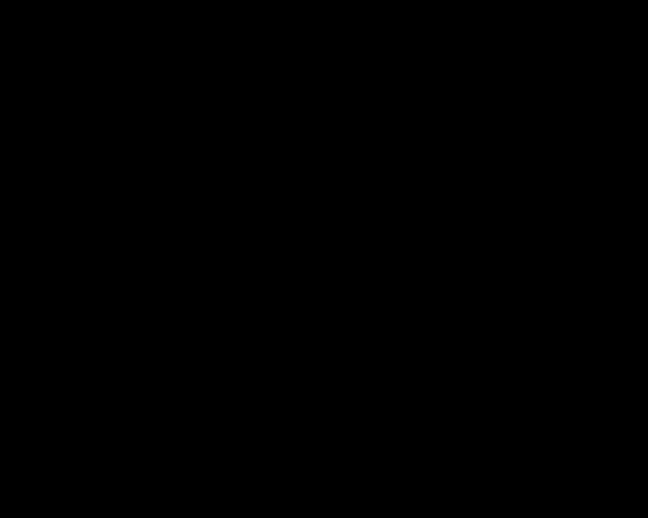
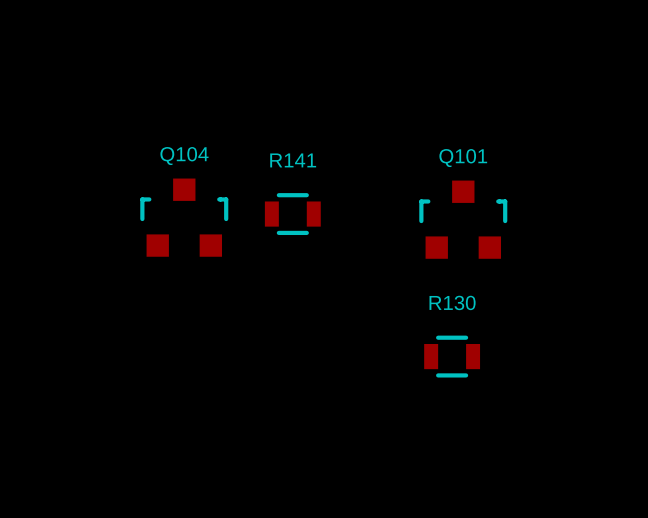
R141: none -> (292, 214)
Q104: none -> (184, 217)
Q101: none -> (463, 219)
R130: none -> (452, 356)

